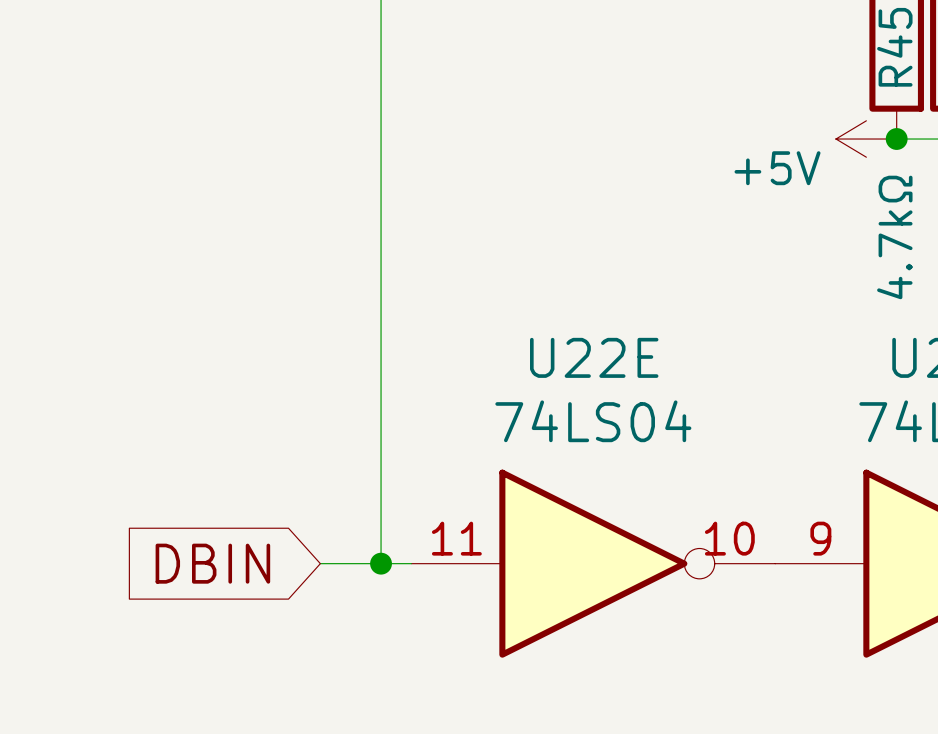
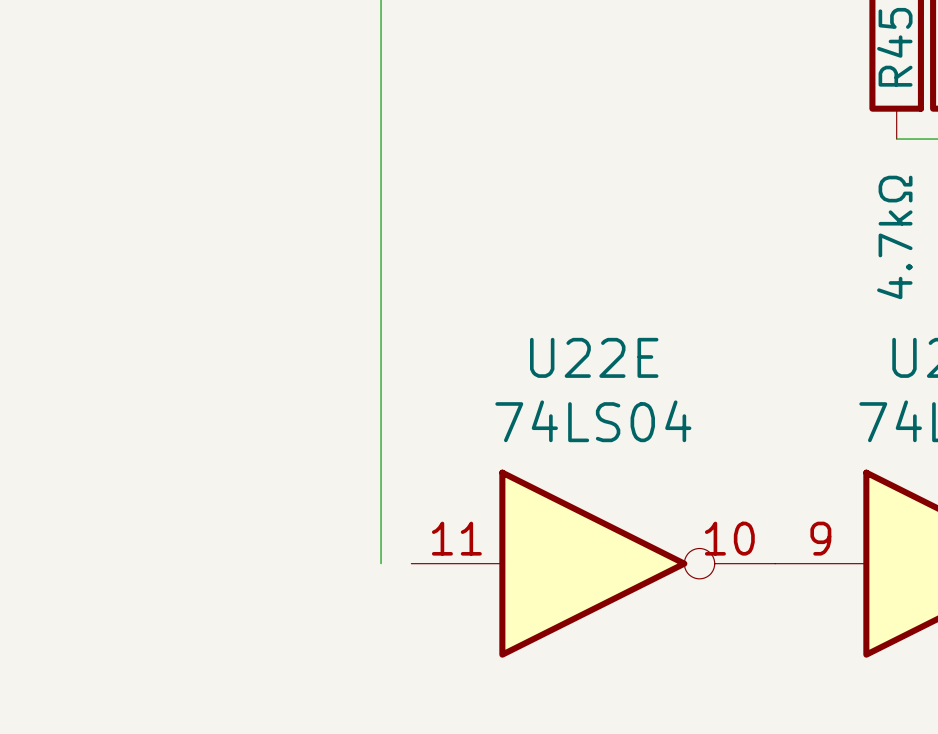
power symbol: +5V (866, 139) -> none
junction: (896, 139) -> none
global label: DBIN (212, 563) -> none
wire: (320, 563) (411, 563) -> none
junction: (381, 563) -> none

